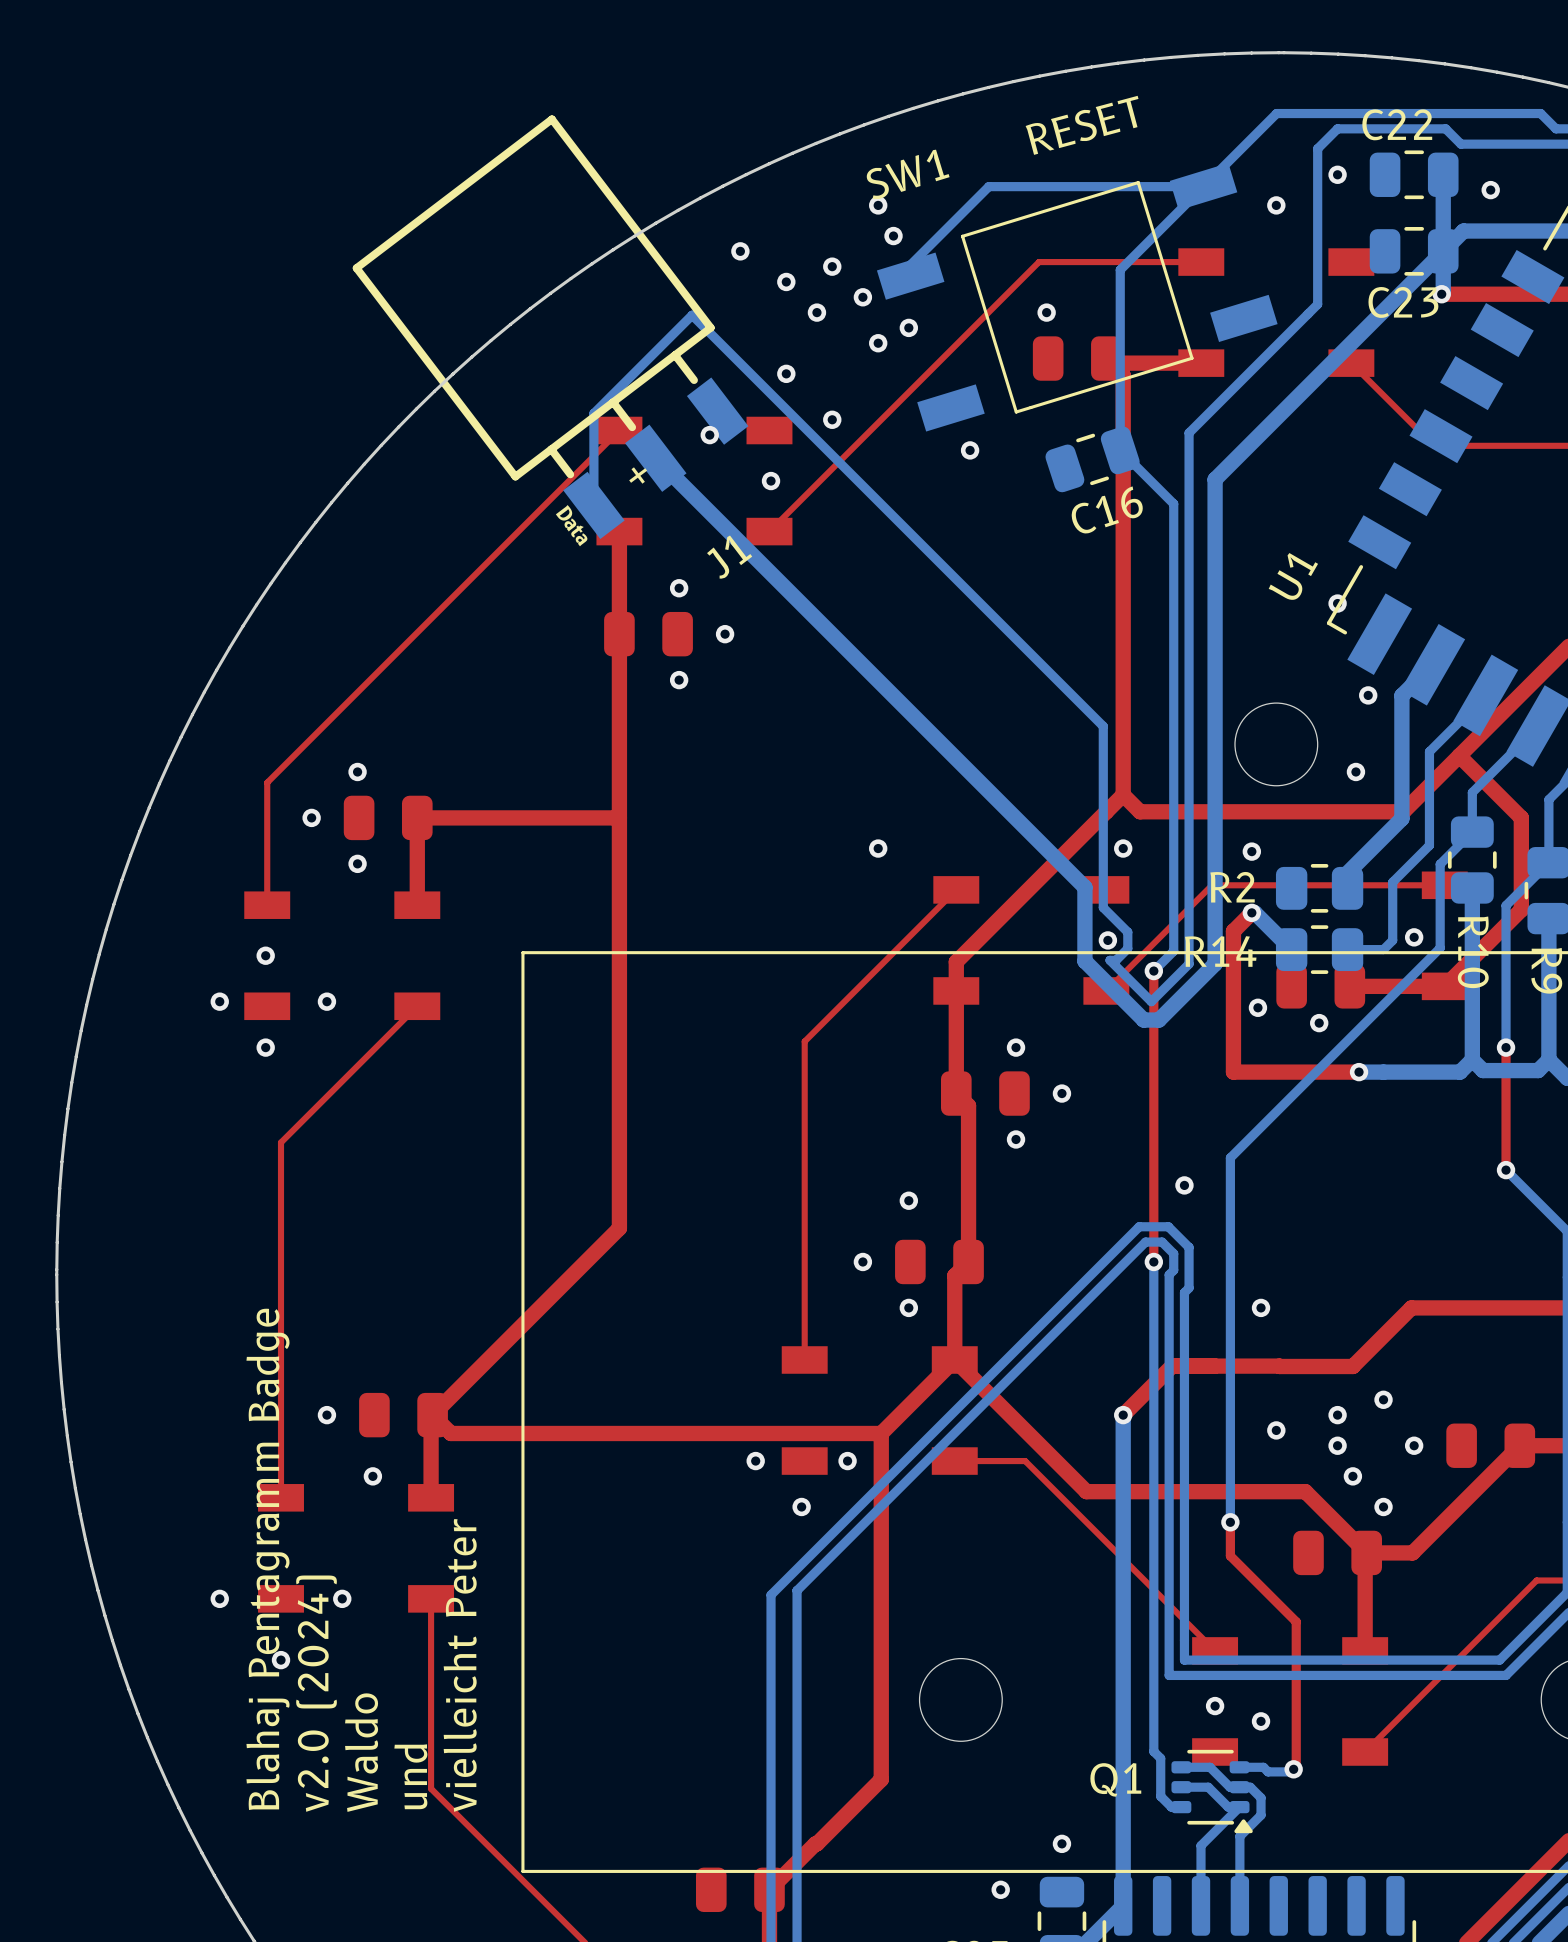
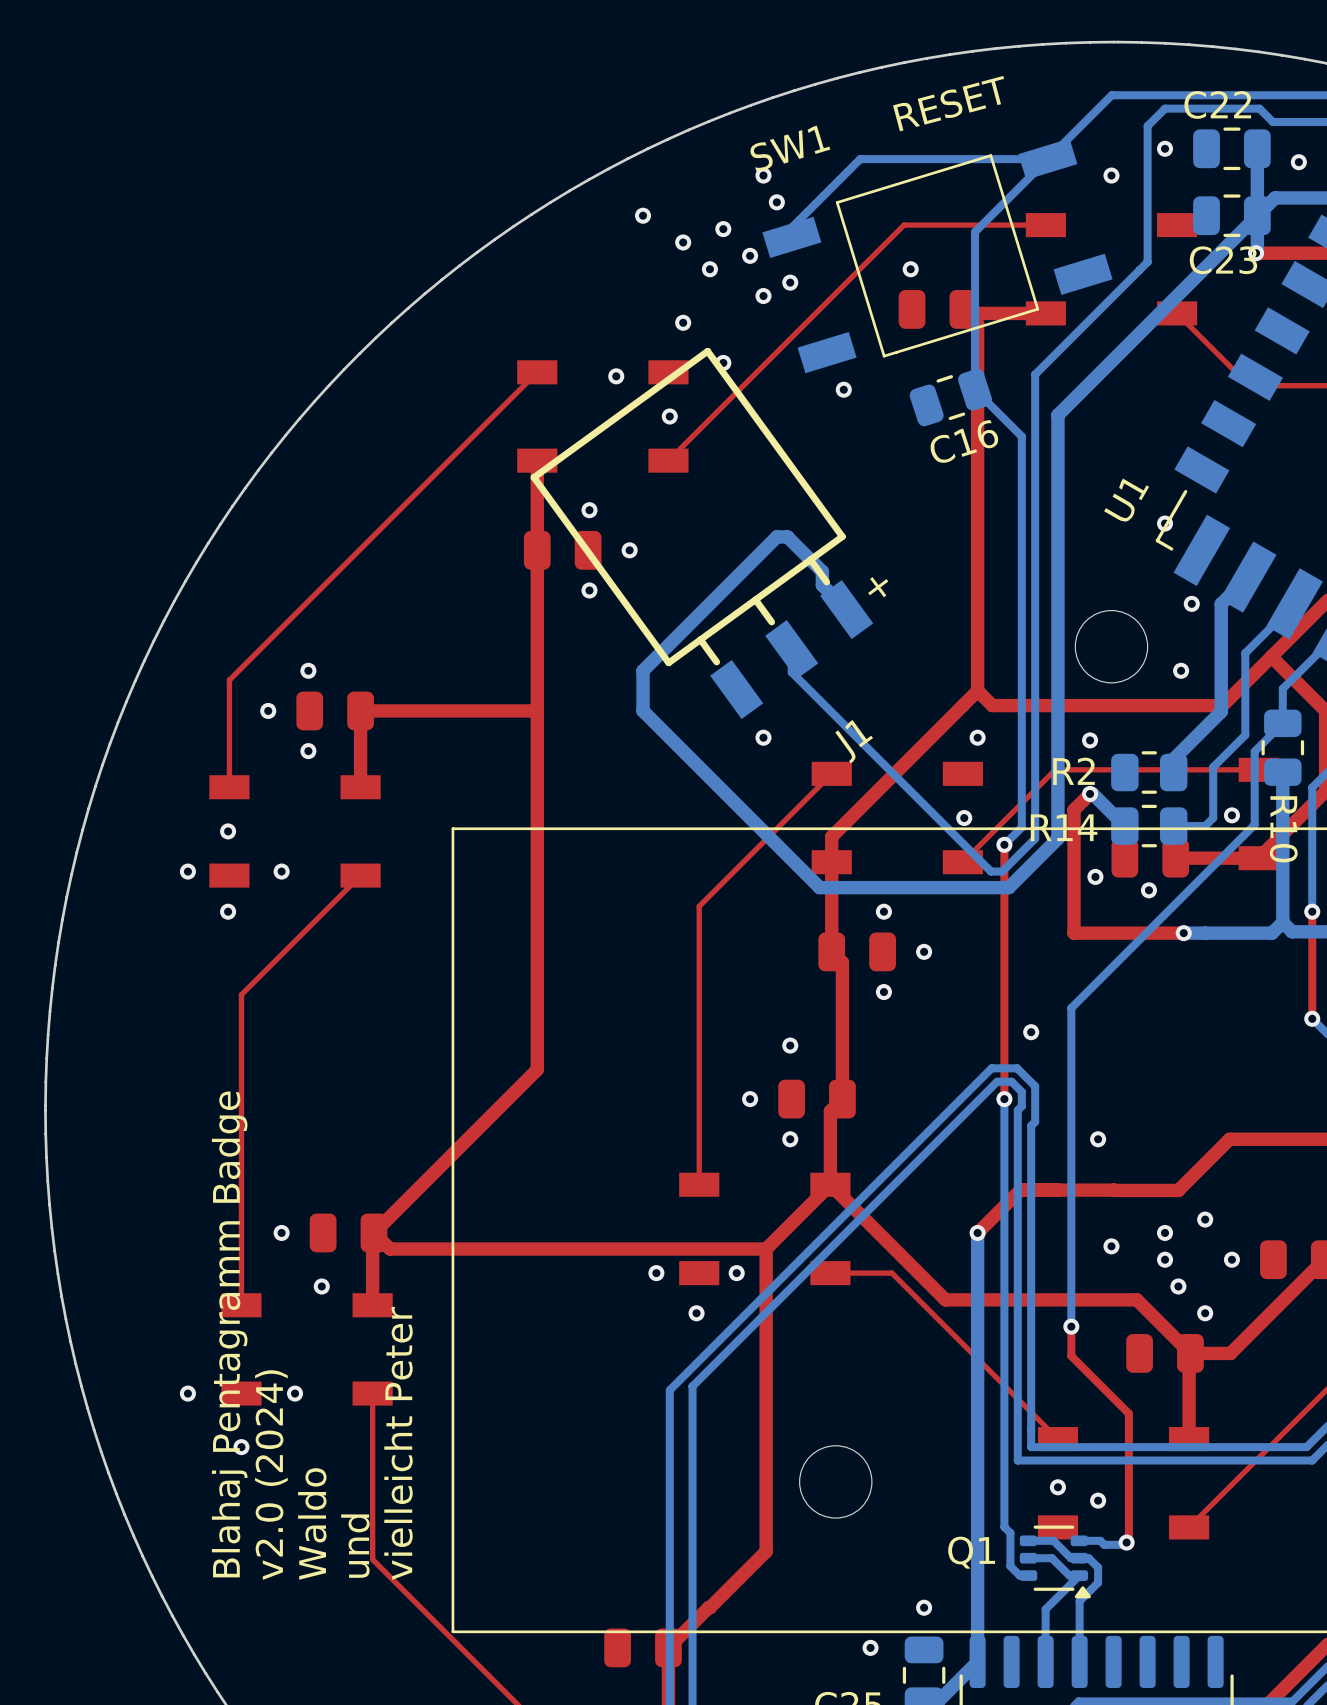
J1 rotation: 0° (550, 327) -> 1.3° clockwise (701, 533)
J1 position: (550, 327) -> (701, 533)
bottom track: (655, 458) (1084, 887) (1084, 961) (1143, 1020) -> (846, 609) (822, 585) (822, 571) (787, 536) (776, 536) (643, 670) (643, 710) (819, 887) (995, 887)
text position: + (638, 475) -> + (878, 587)
bottom track: (593, 505) (593, 413) (692, 315) (1103, 726) (1103, 907) (1127, 932) (1127, 948) (1116, 960) (1110, 960) (1151, 1001) -> (791, 649) (791, 672) (991, 871) (1002, 871)
text: Data (571, 525) -> none

